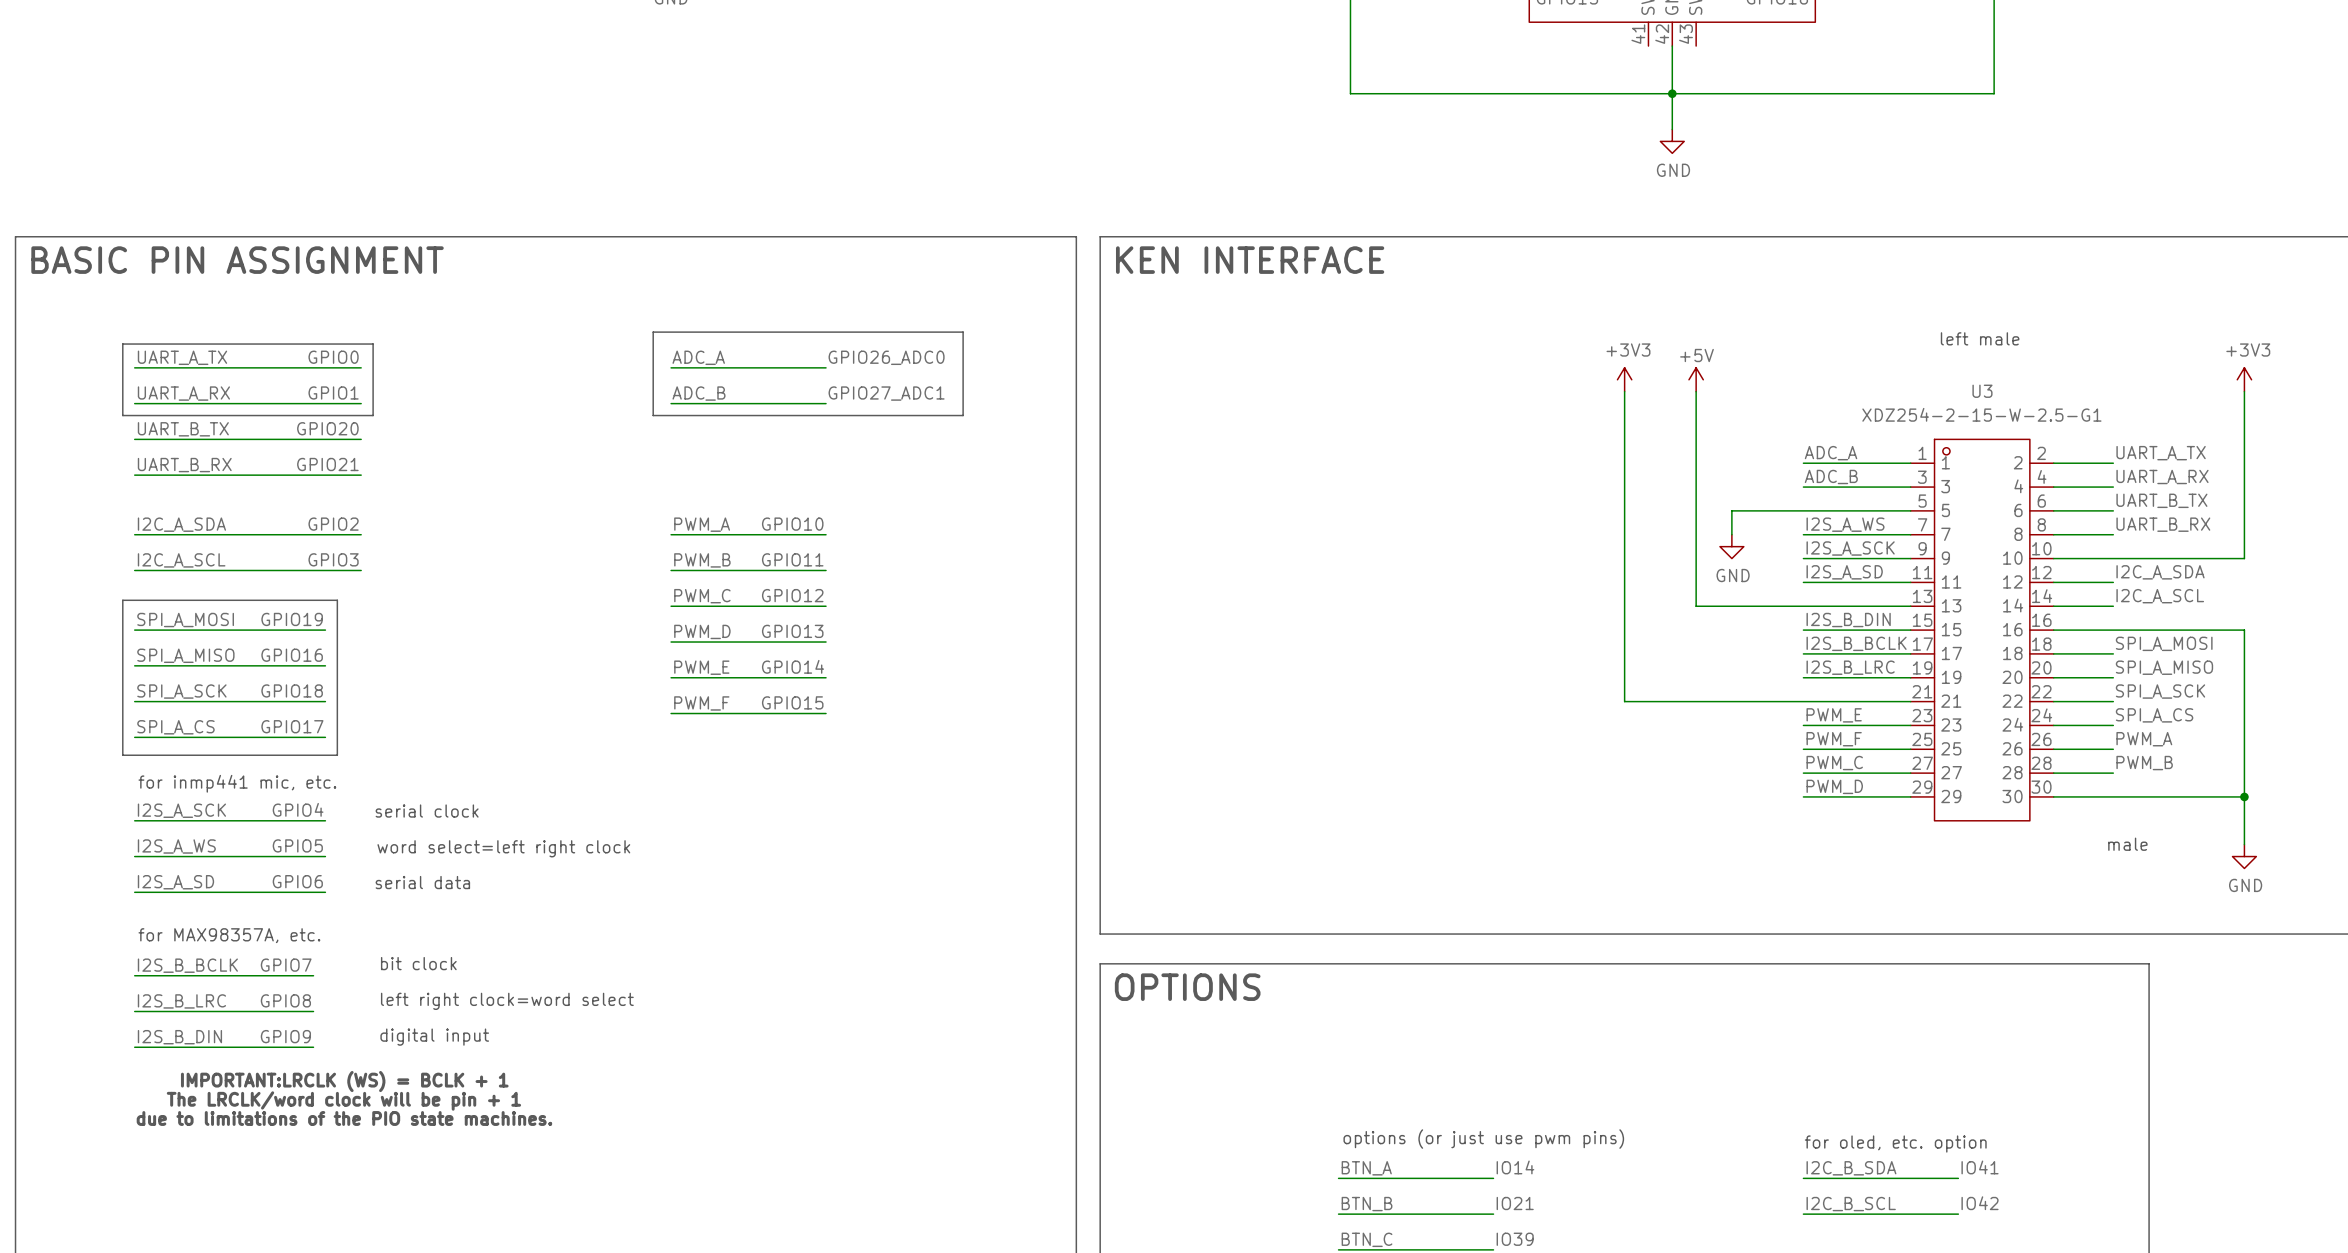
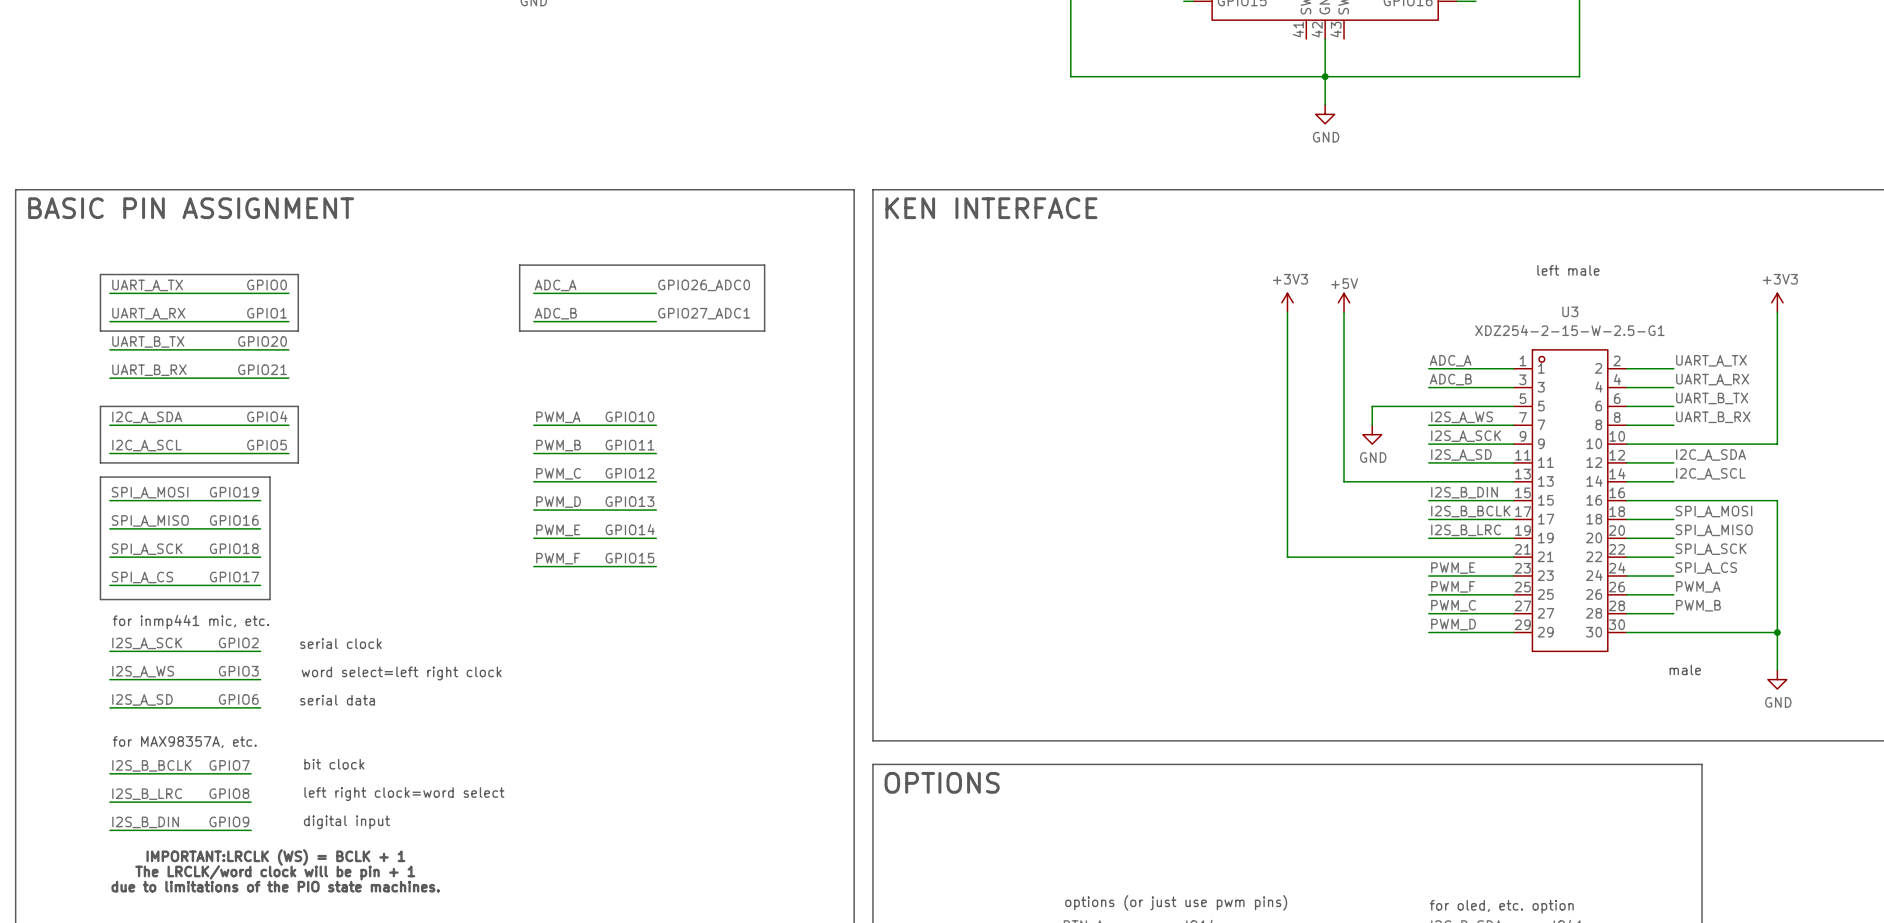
line: none -> (100, 406) (298, 406) (298, 462) (100, 462) (100, 406)
label: GPIO2 (333, 524) -> GPIO4 (267, 416)
label: GPIO3 (333, 559) -> GPIO5 (267, 445)
label: GPIO4 (298, 809) -> GPIO2 (238, 642)
label: GPIO5 (297, 845) -> GPIO3 (238, 671)

